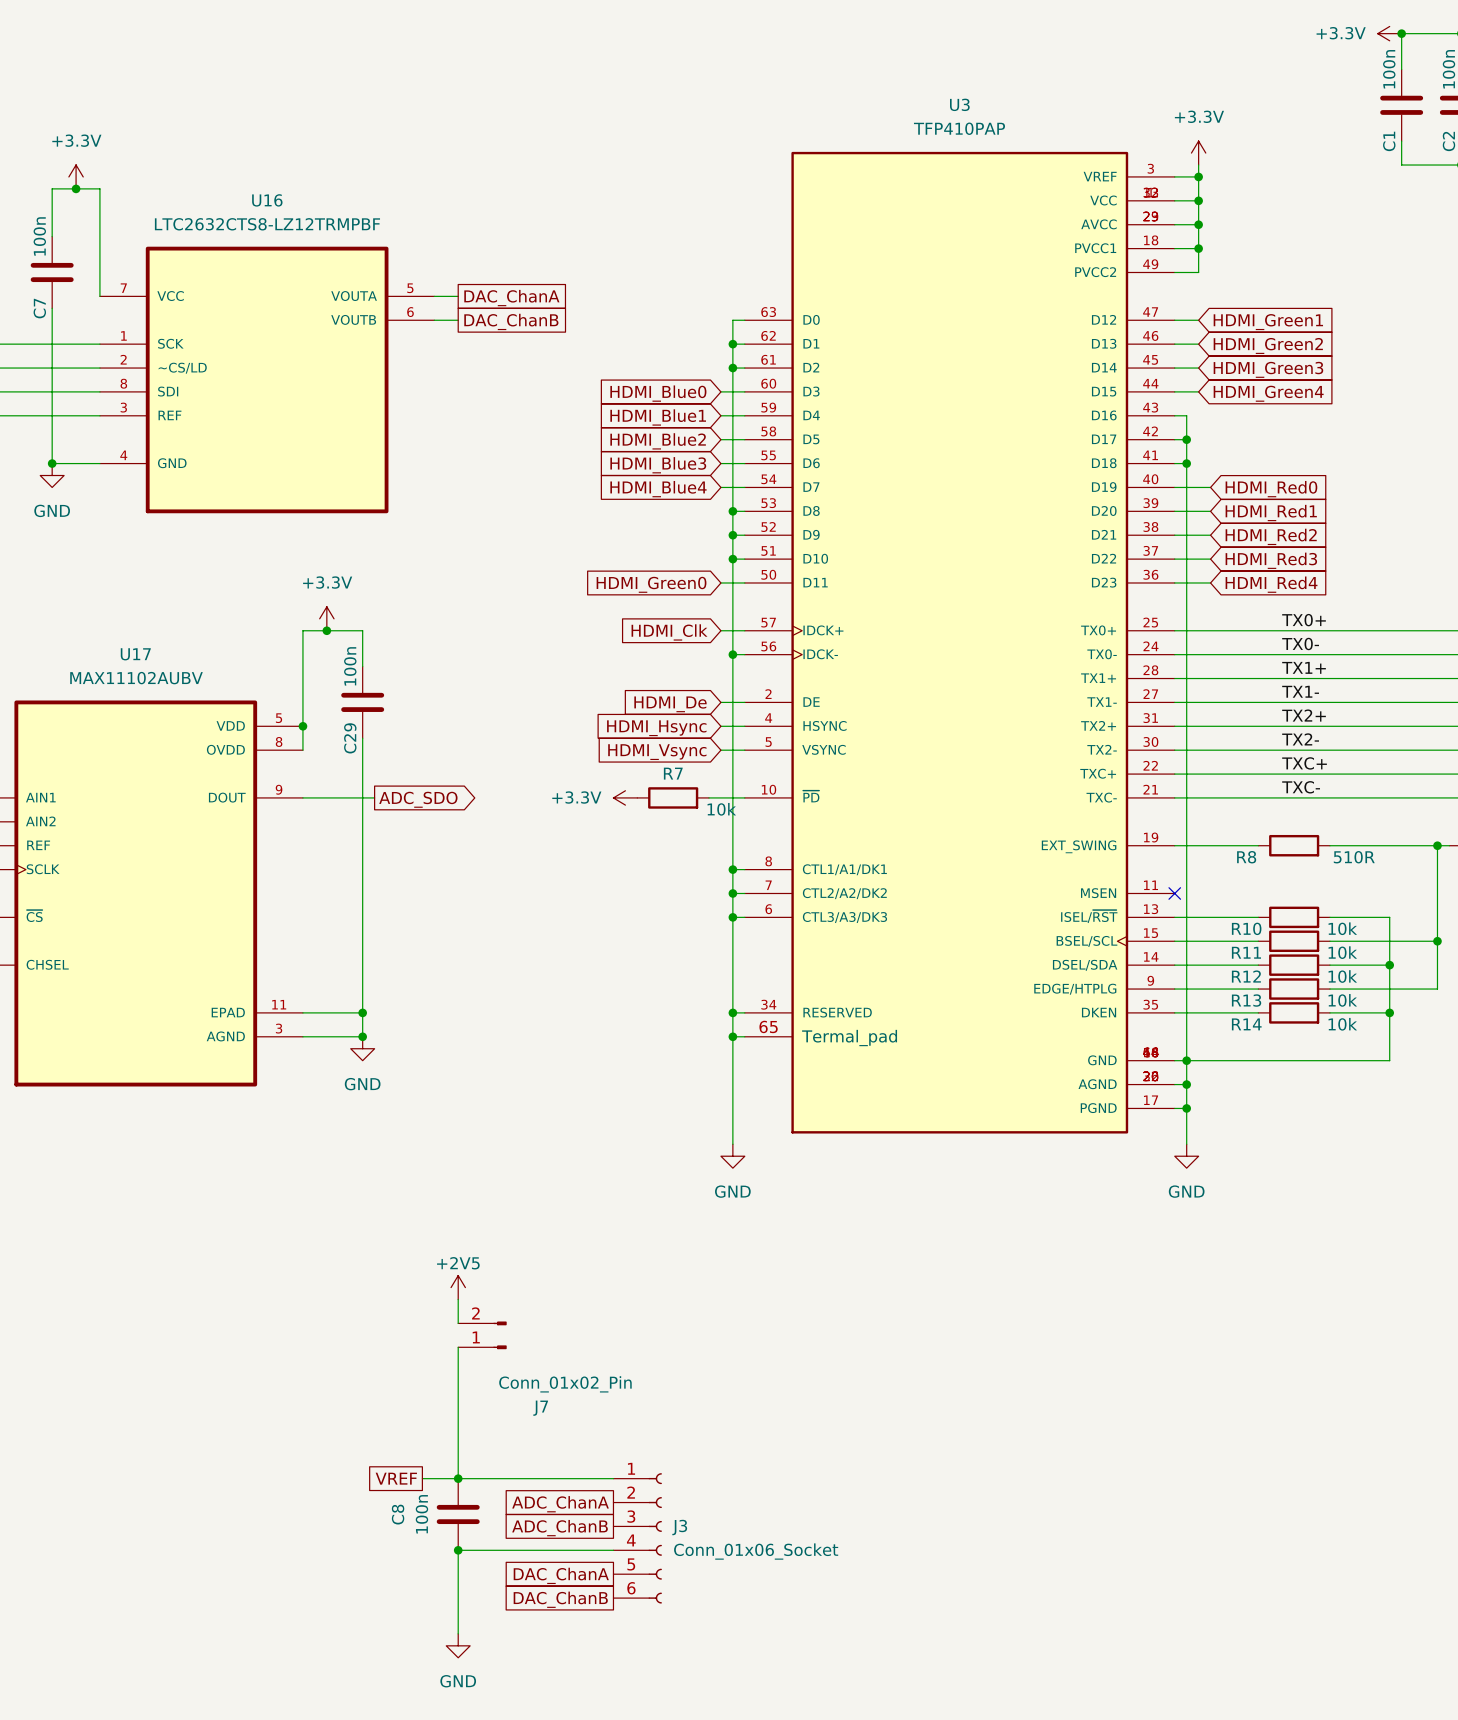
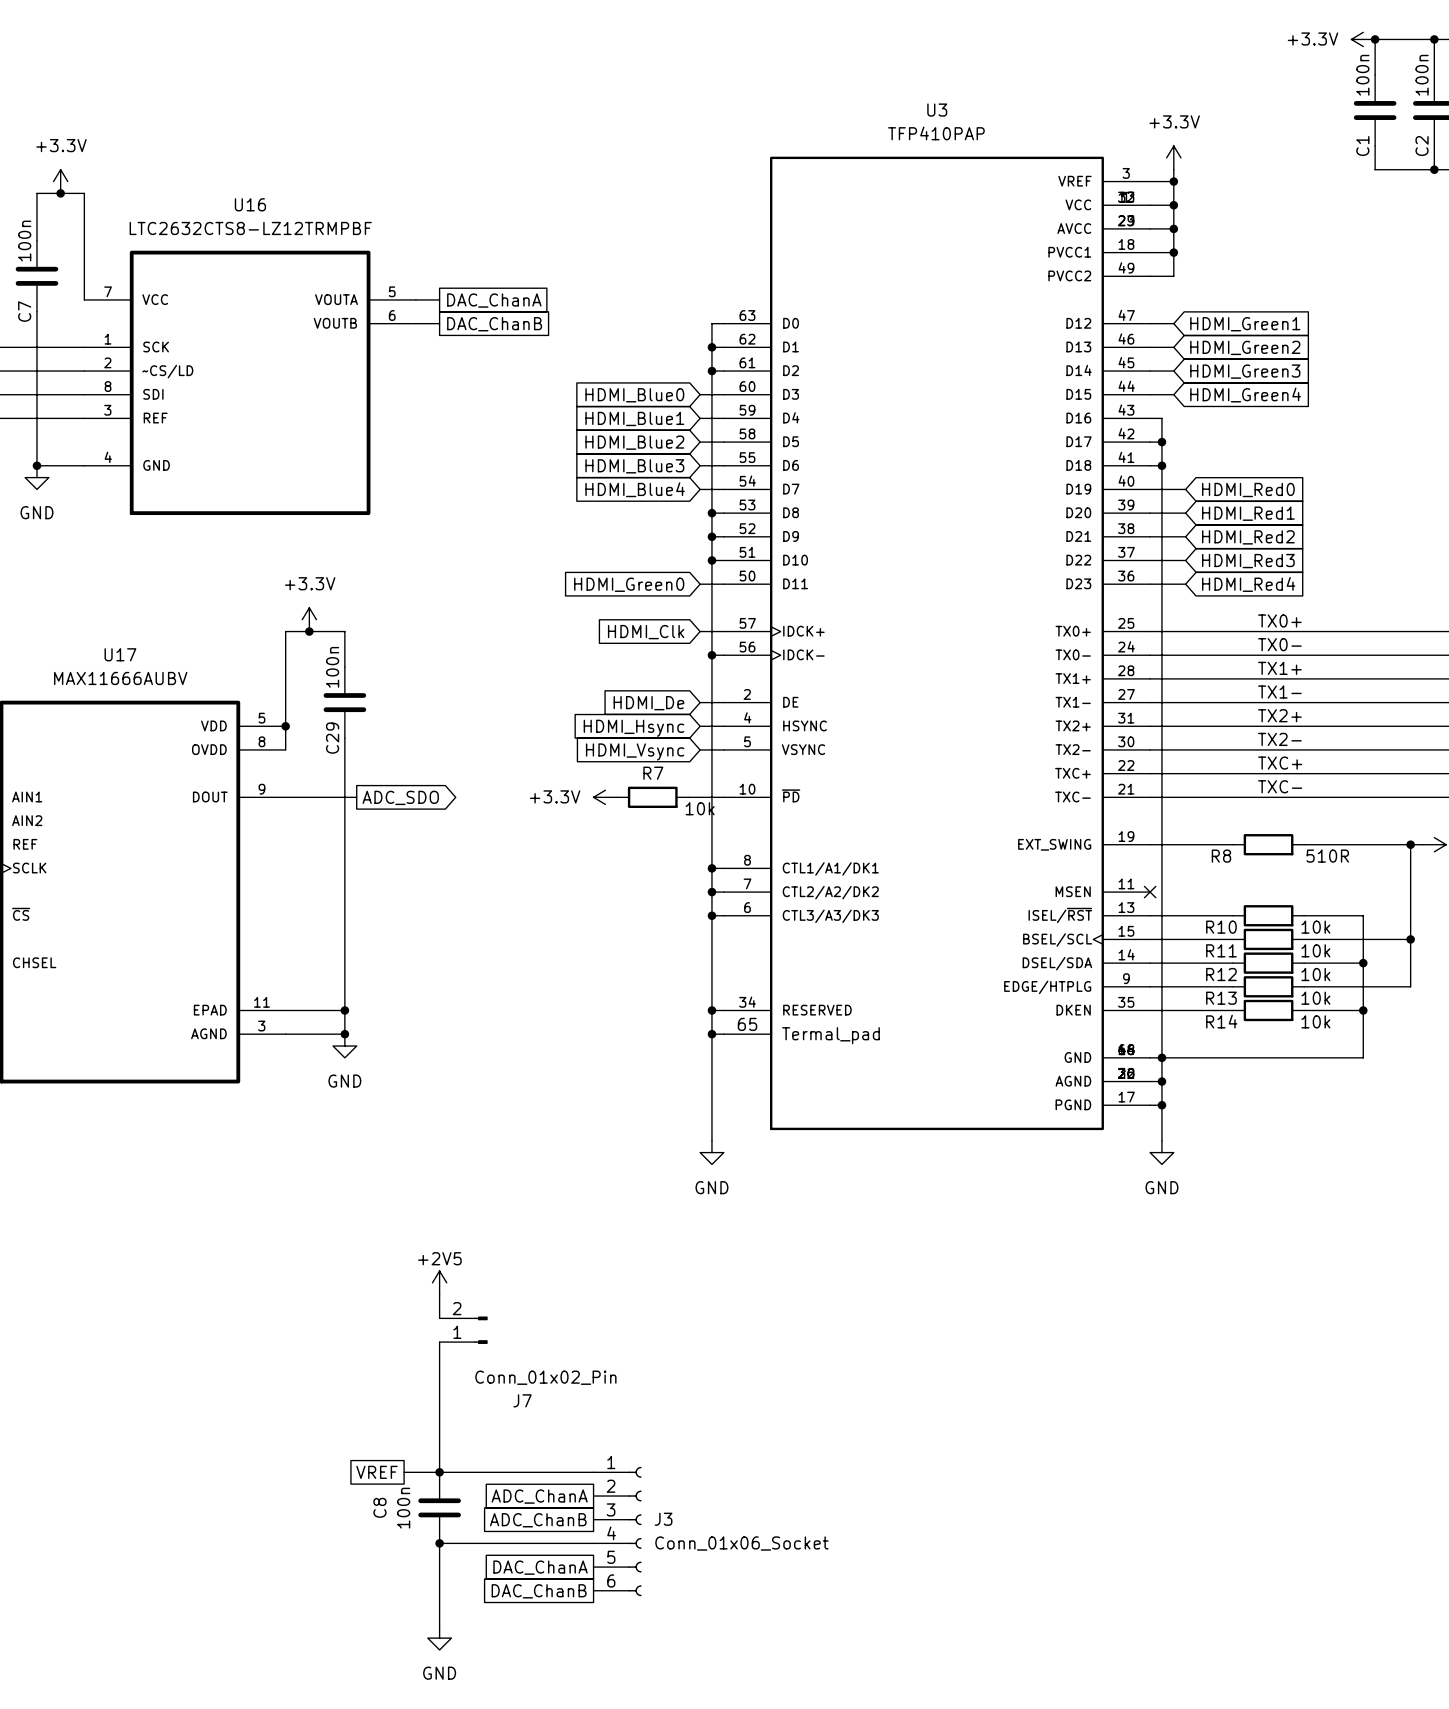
U17 value: MAX11102AUBV (136, 678) -> MAX11666AUBV (120, 678)

